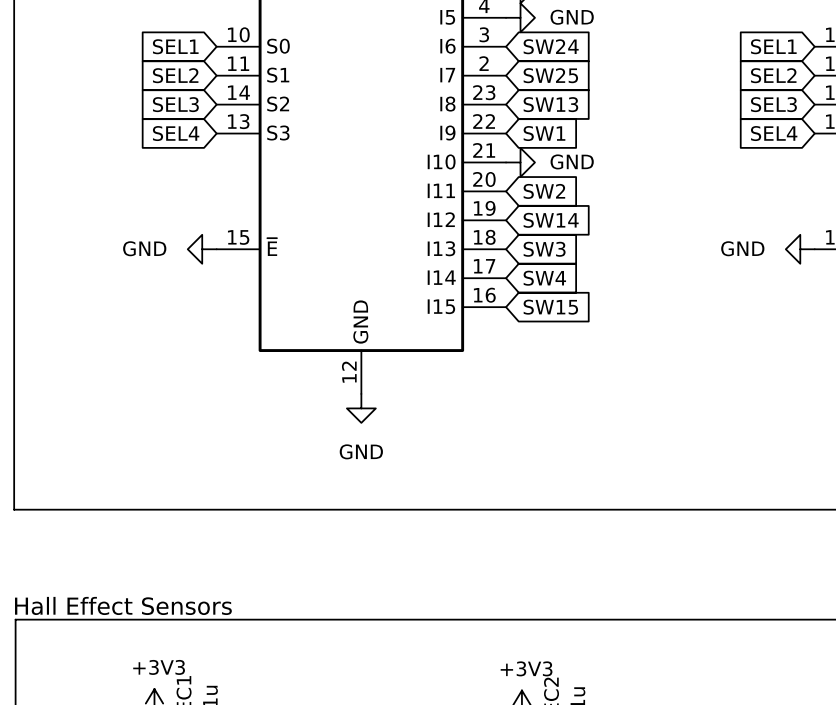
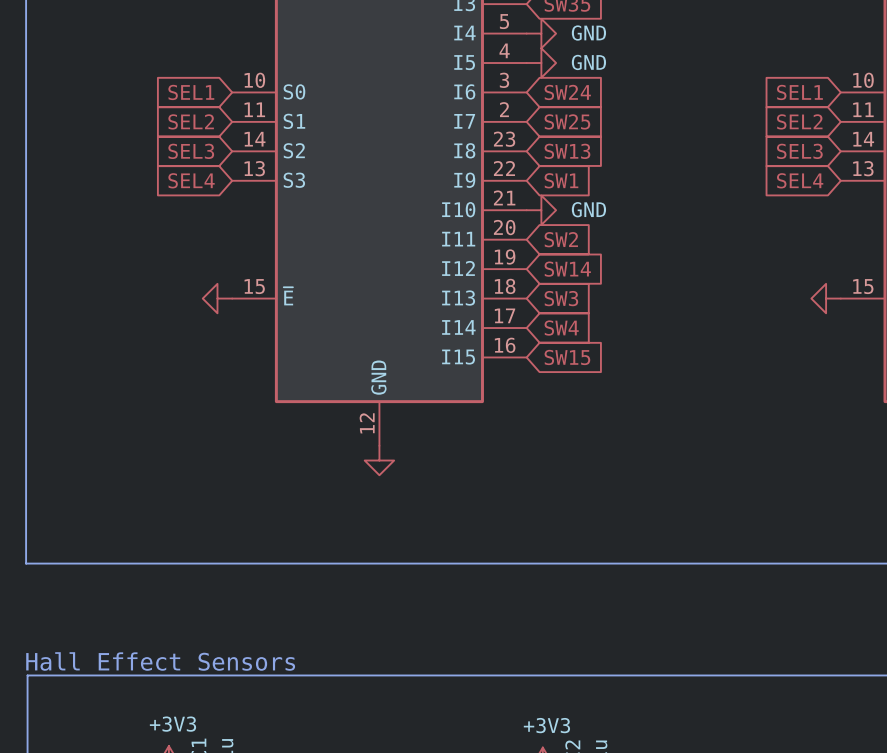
power symbol text: GND (144, 248) -> none
power symbol text: GND (742, 248) -> none
power symbol text: GND (361, 451) -> none

